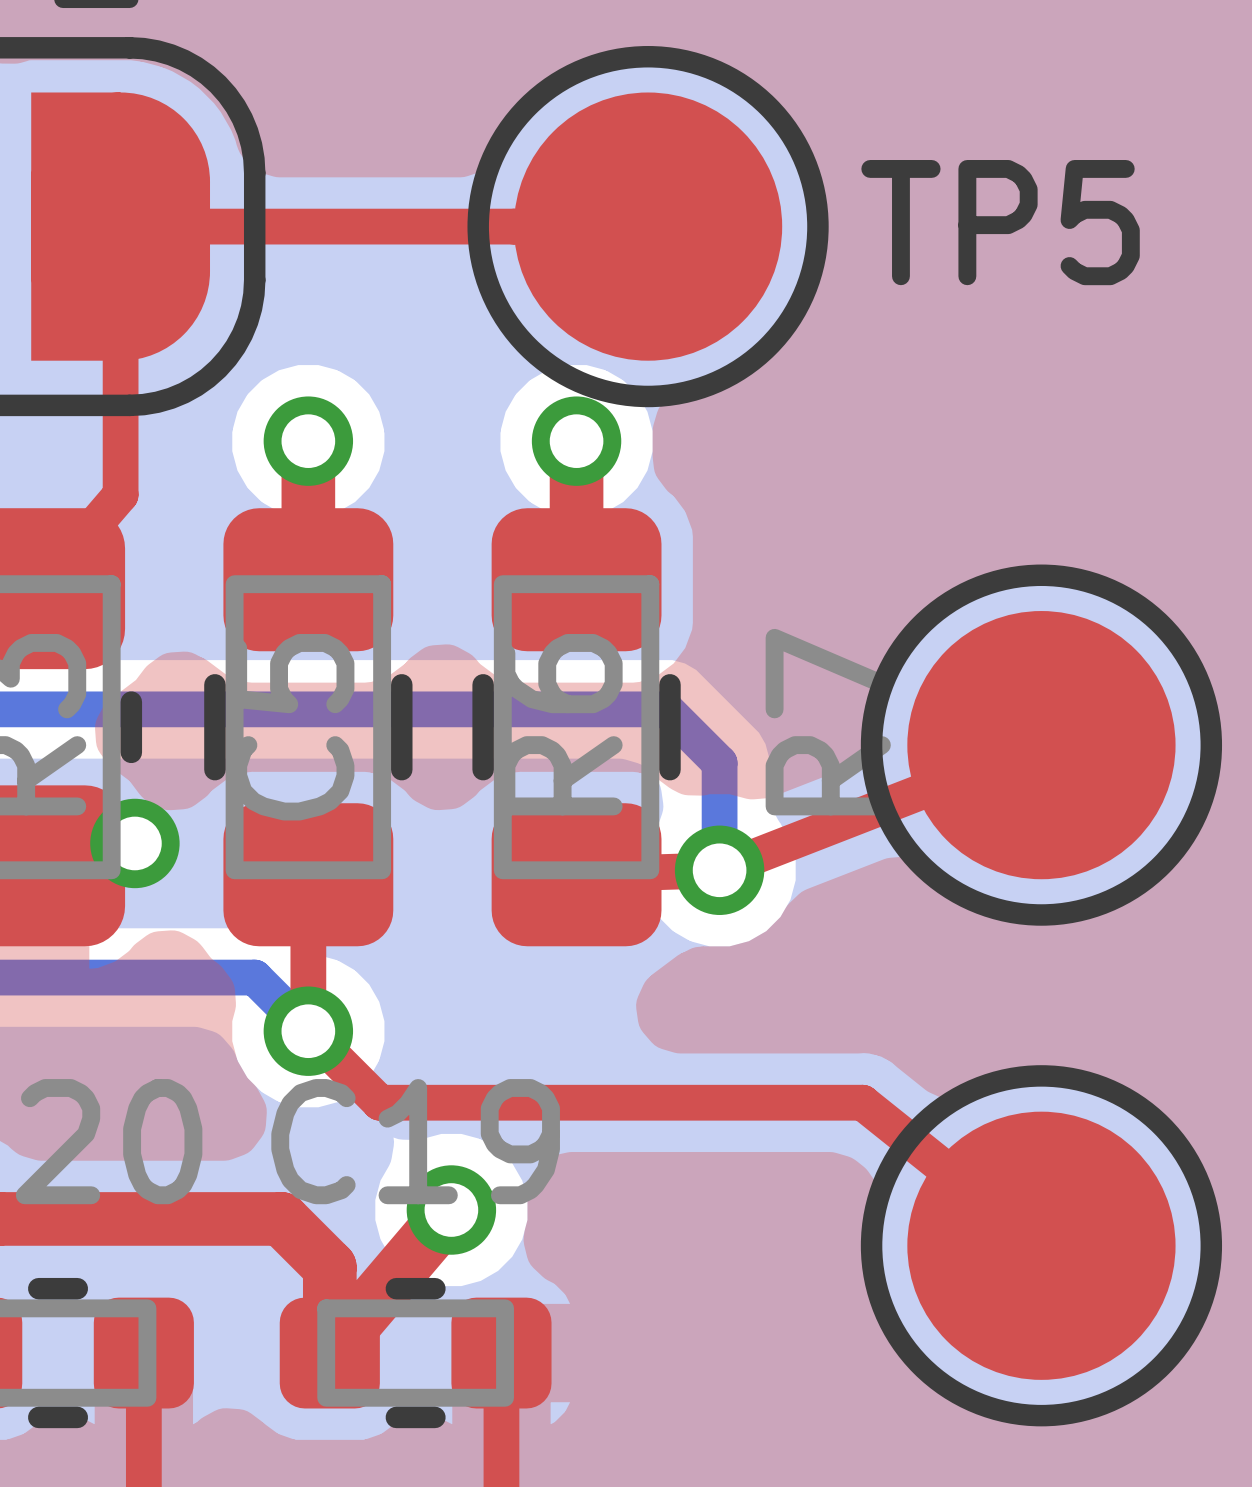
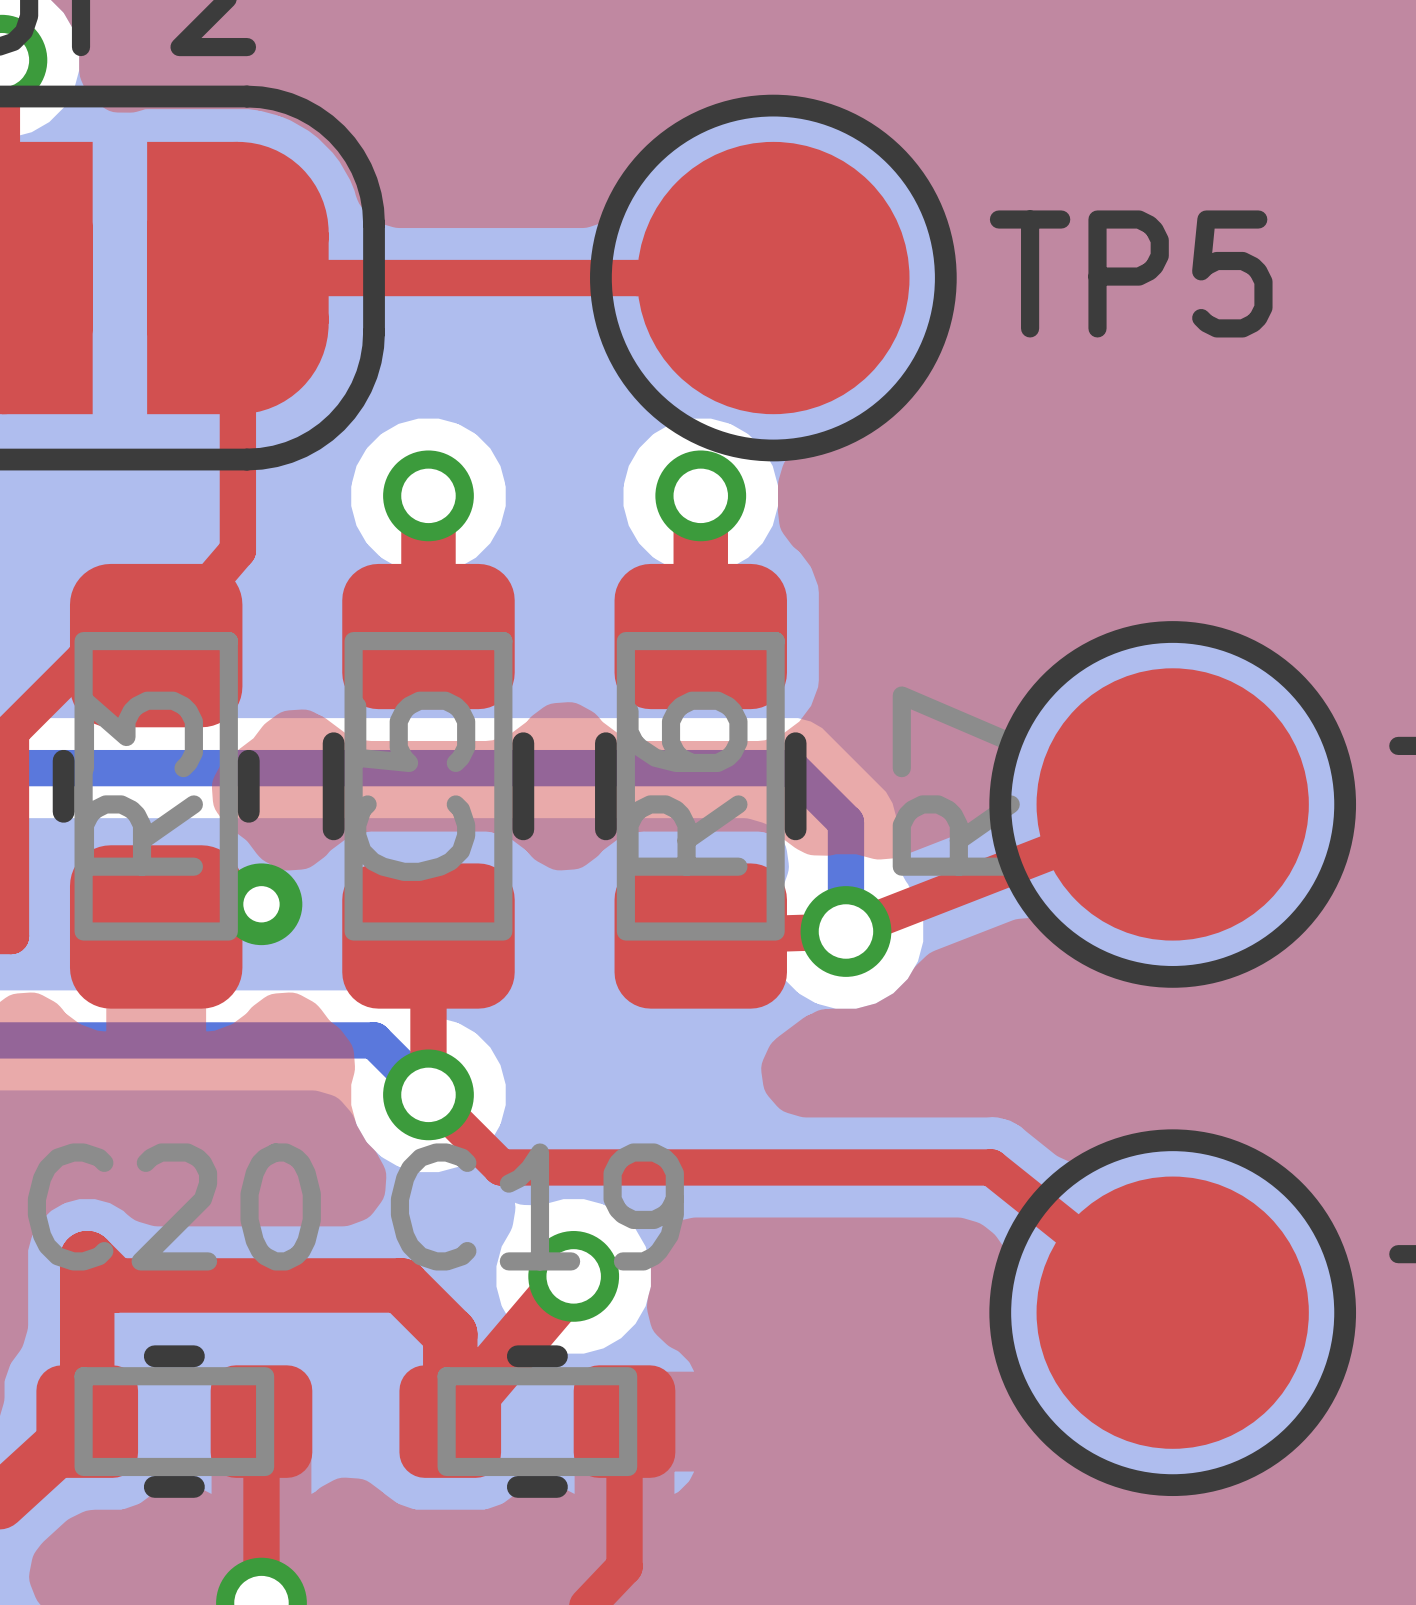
via size: [90, 798, 180, 889] -> [220, 863, 303, 946]

